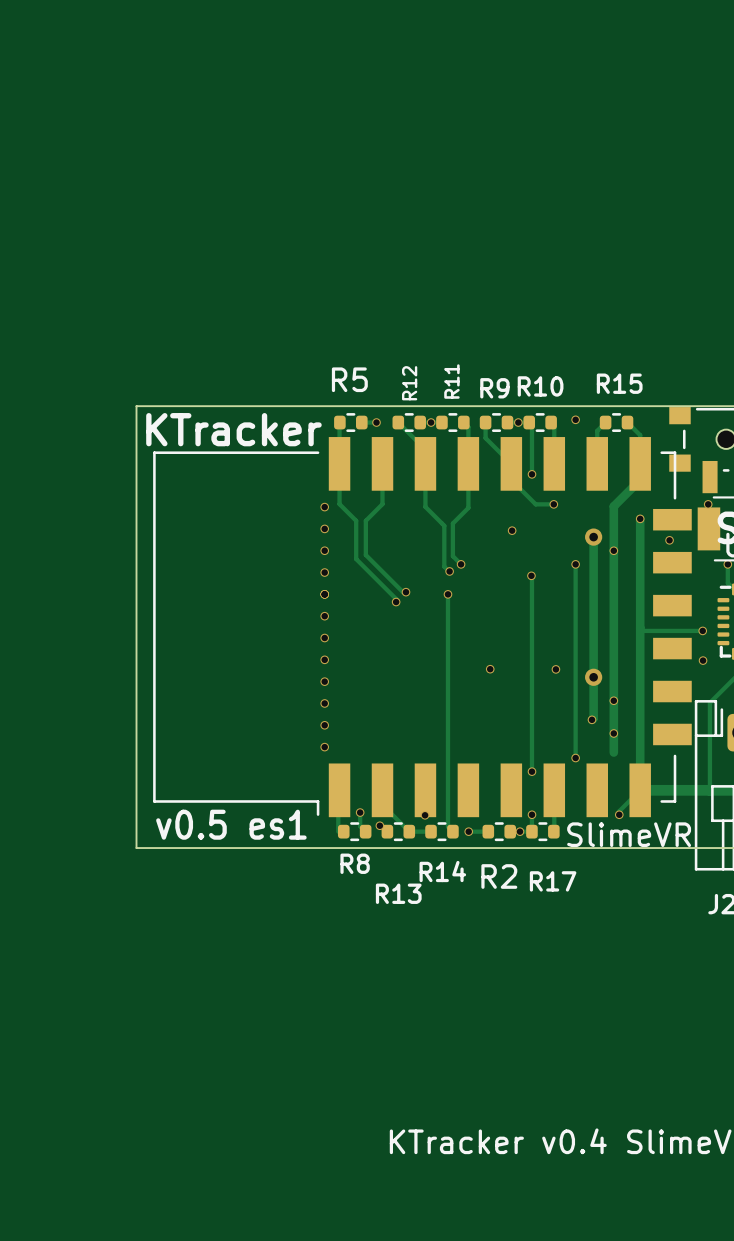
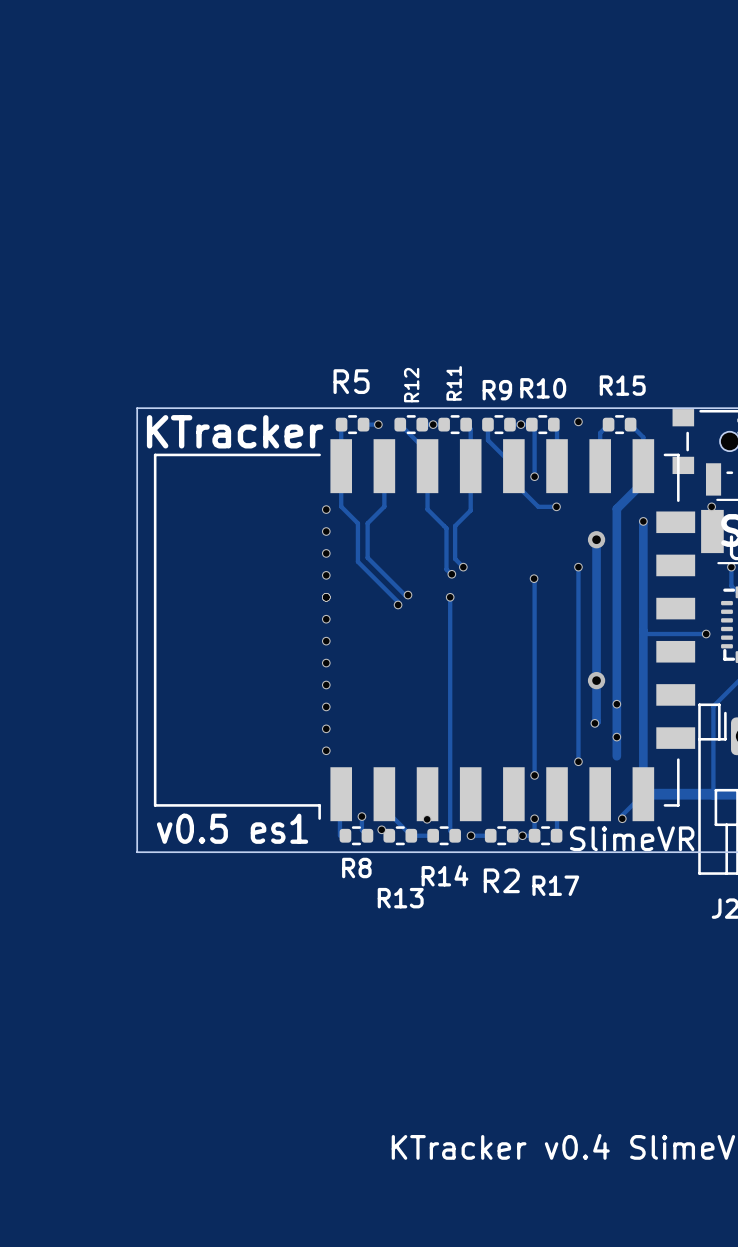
via: (512, 530) -> none
via: (669, 540) -> none
via: (613, 550) -> none
via: (703, 660) -> none
via: (490, 669) -> none
via: (555, 669) -> none

